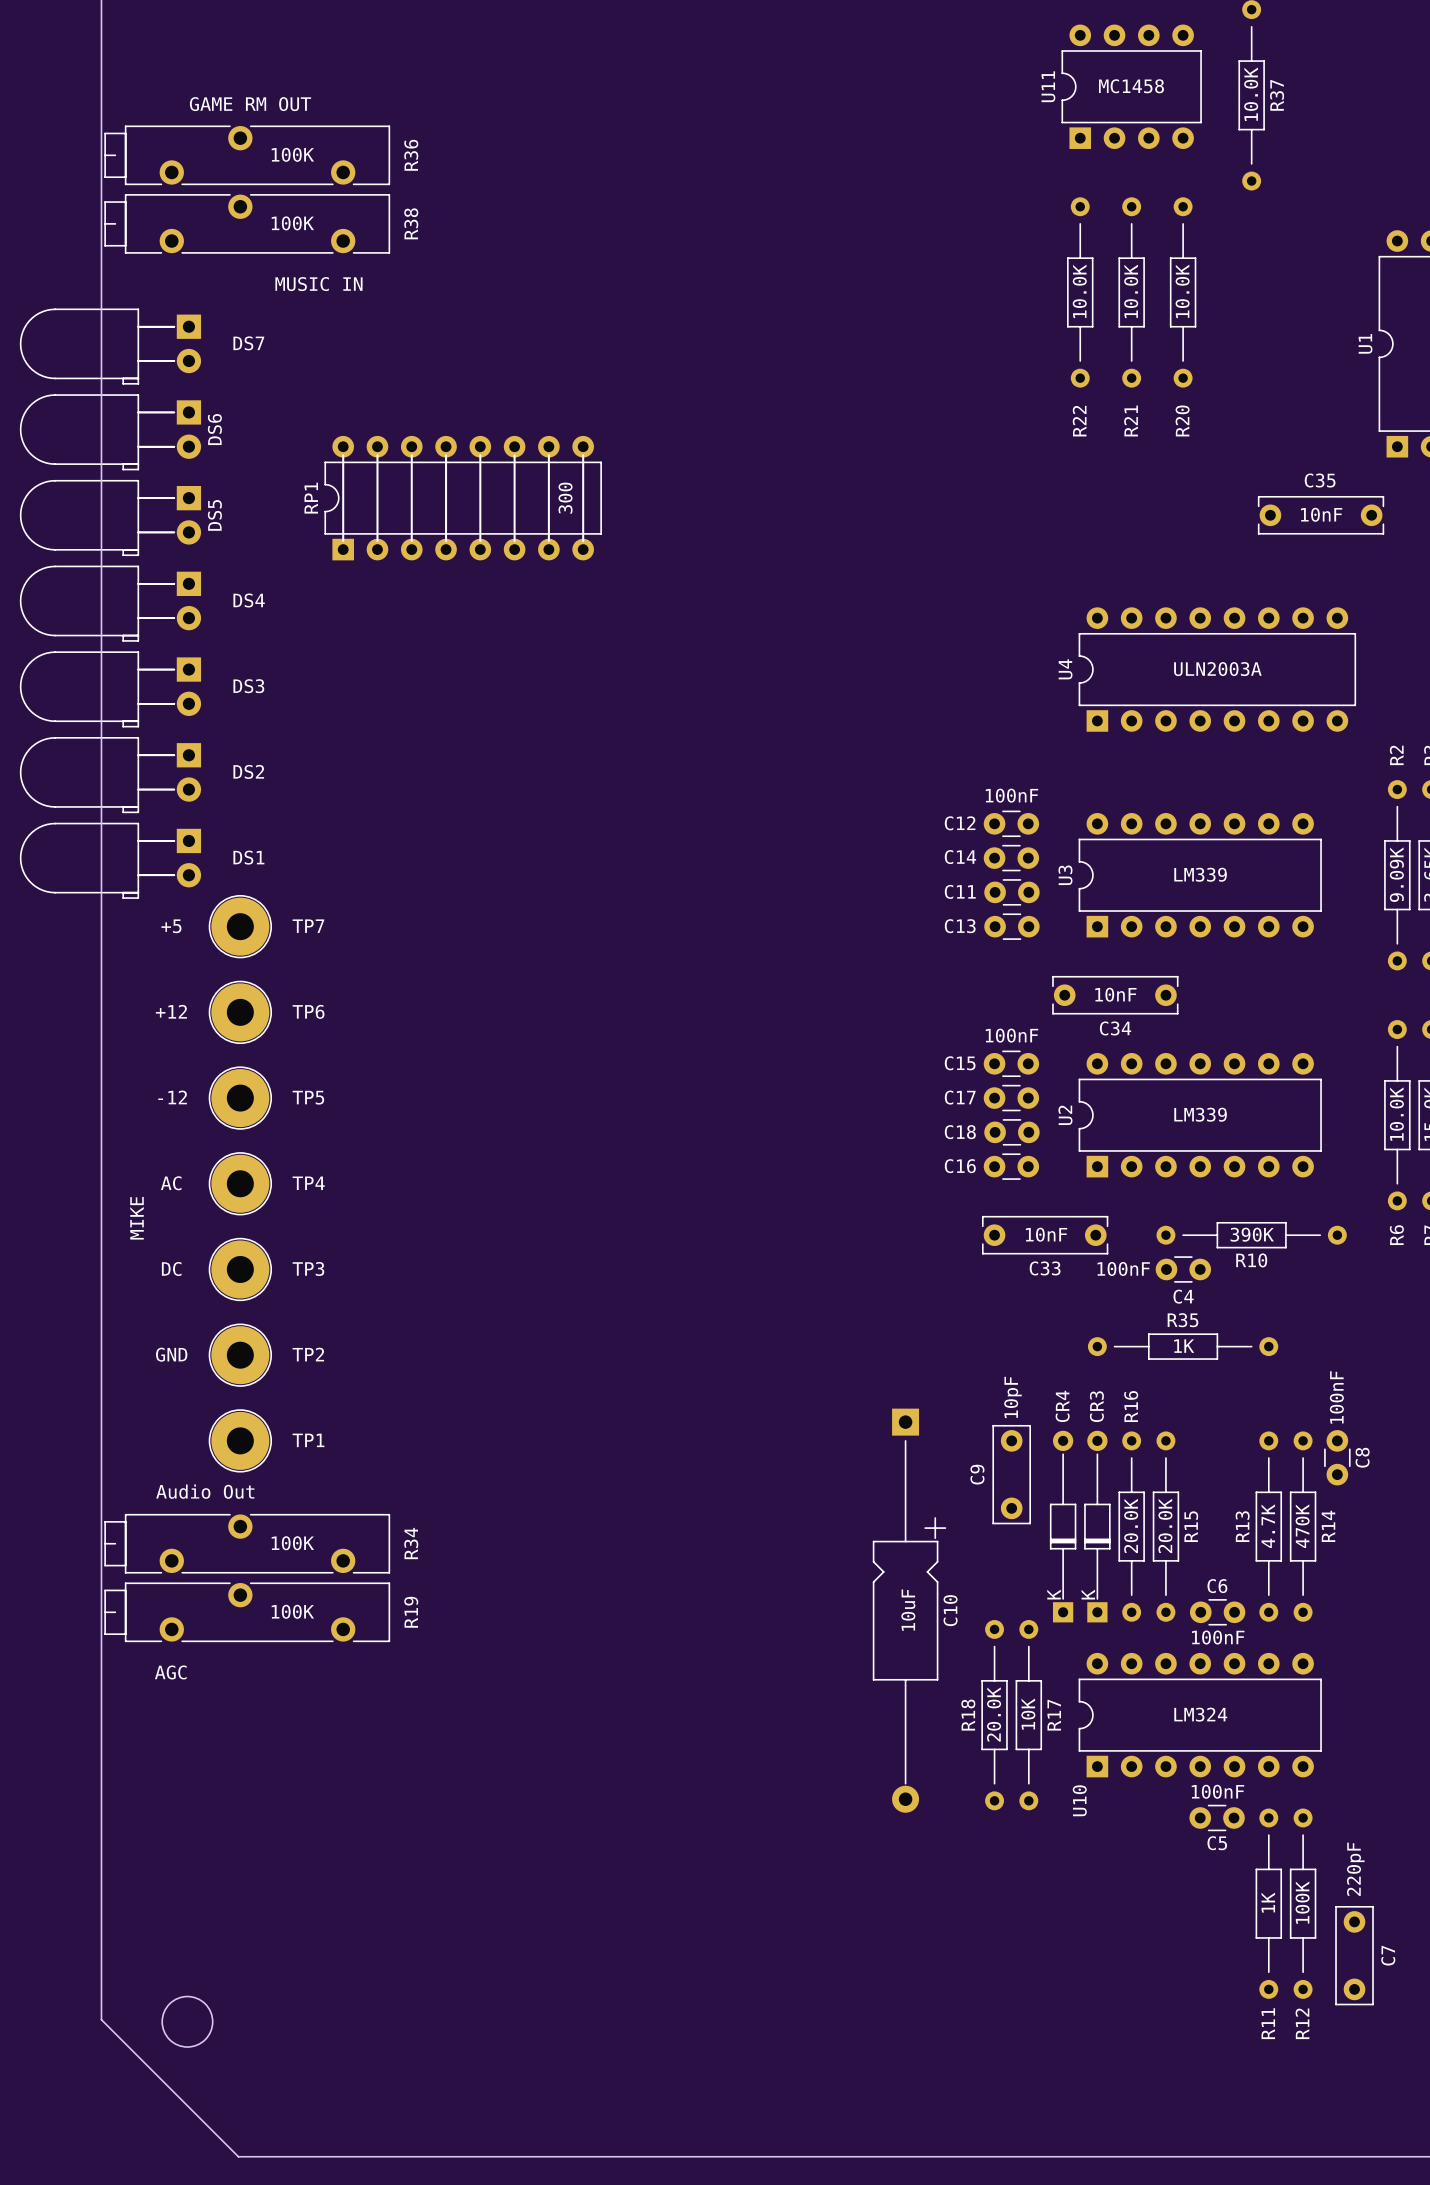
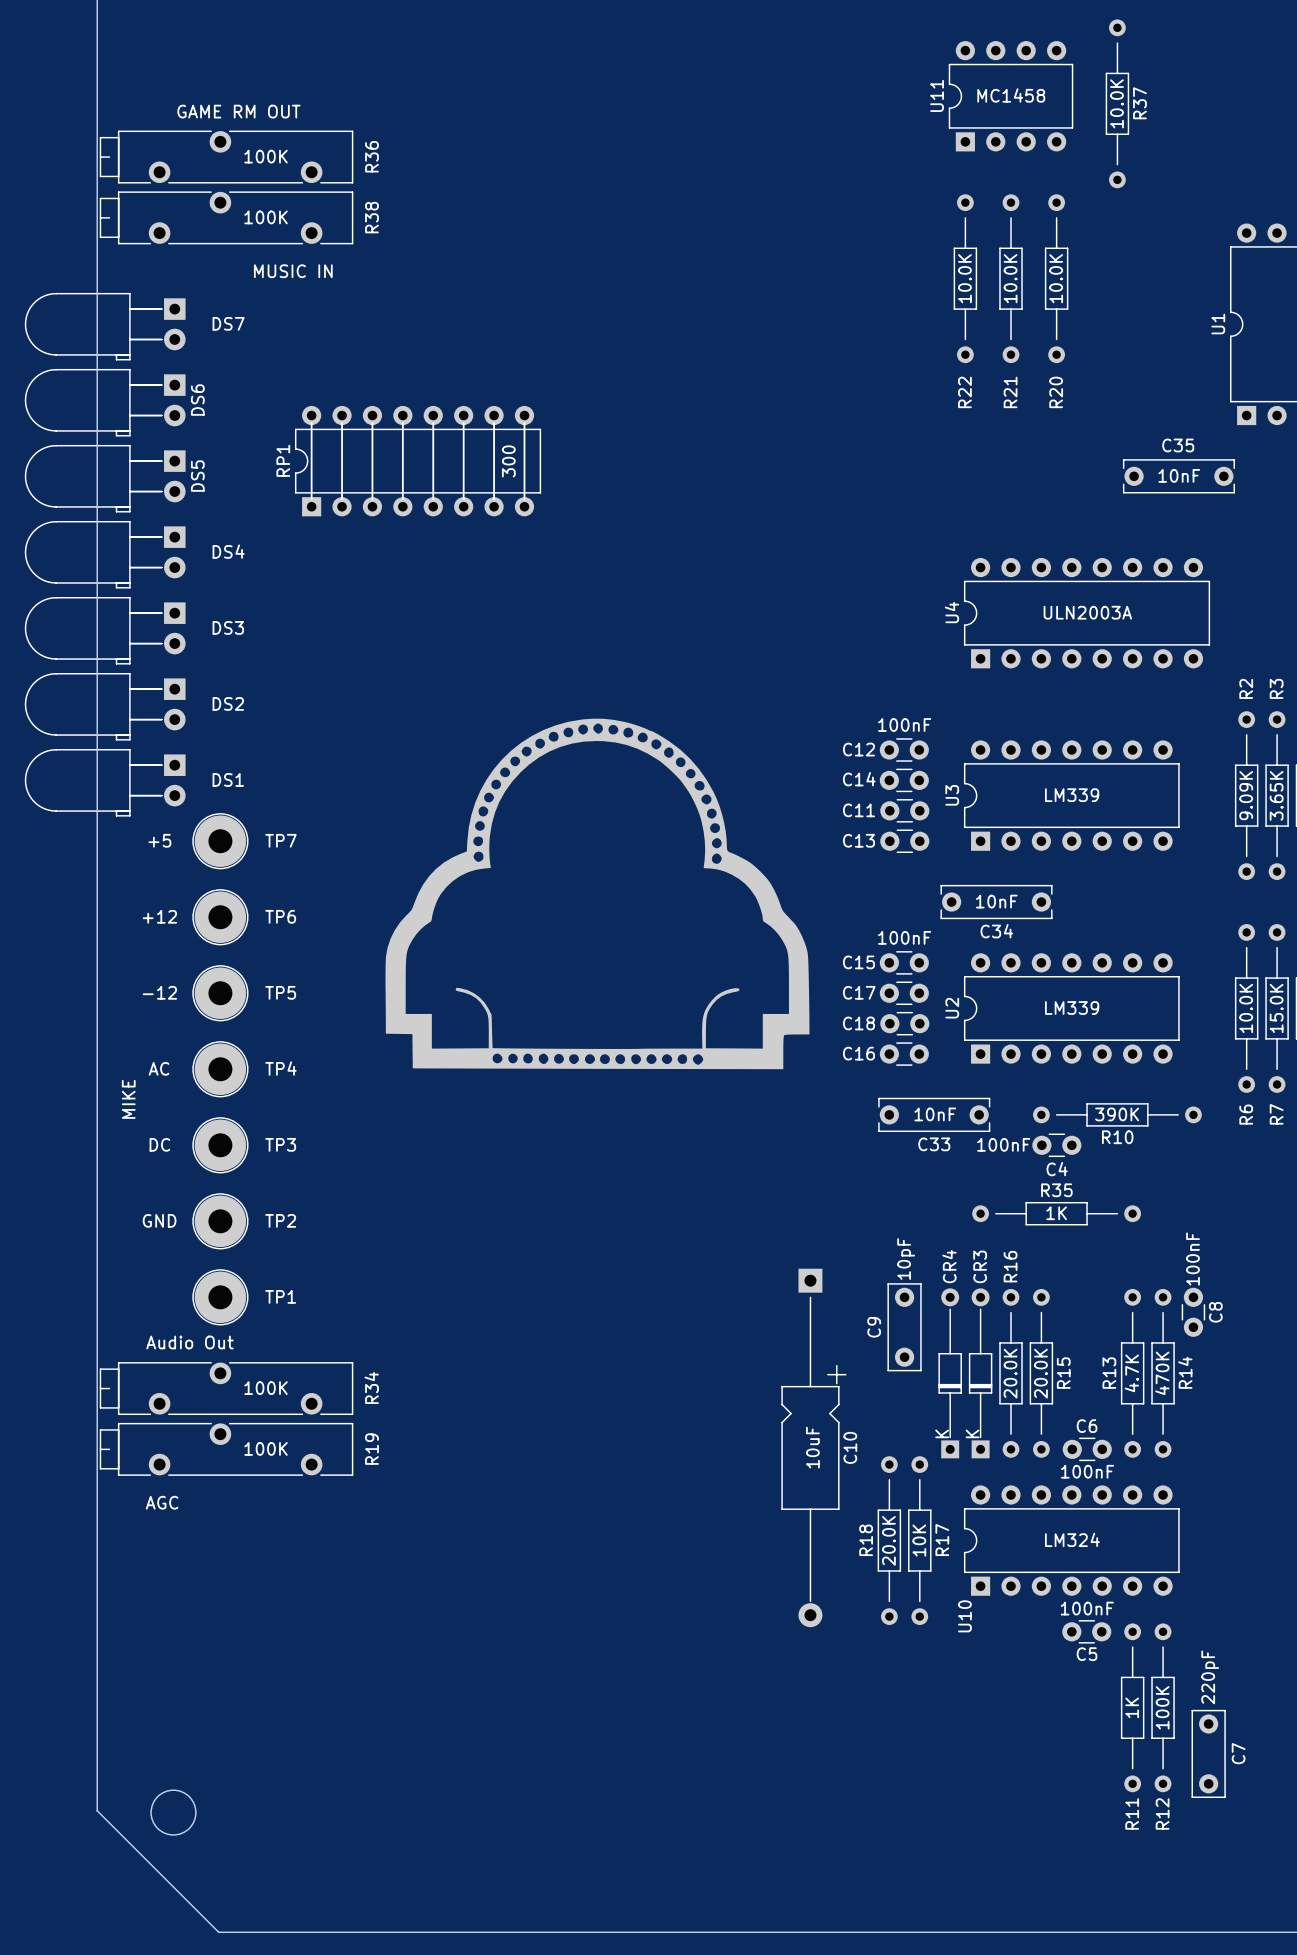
part: none -> (597, 893)

